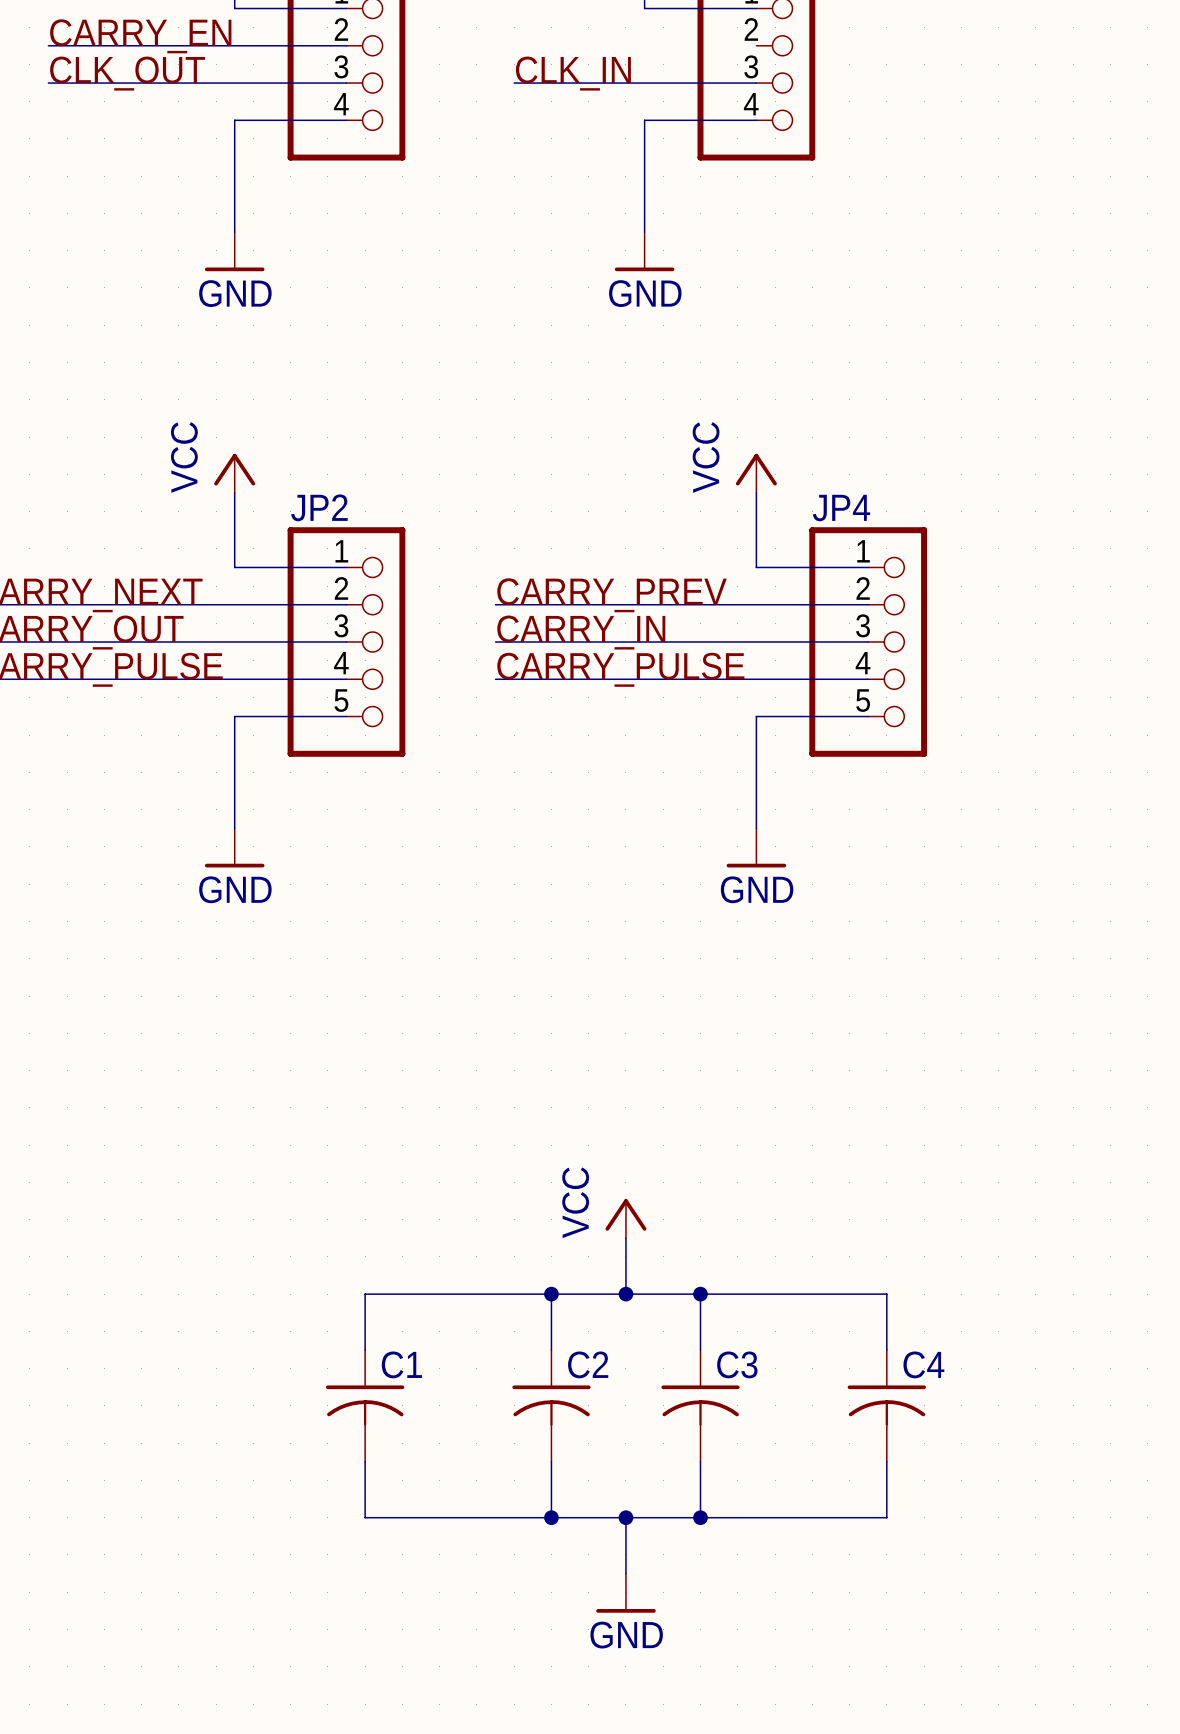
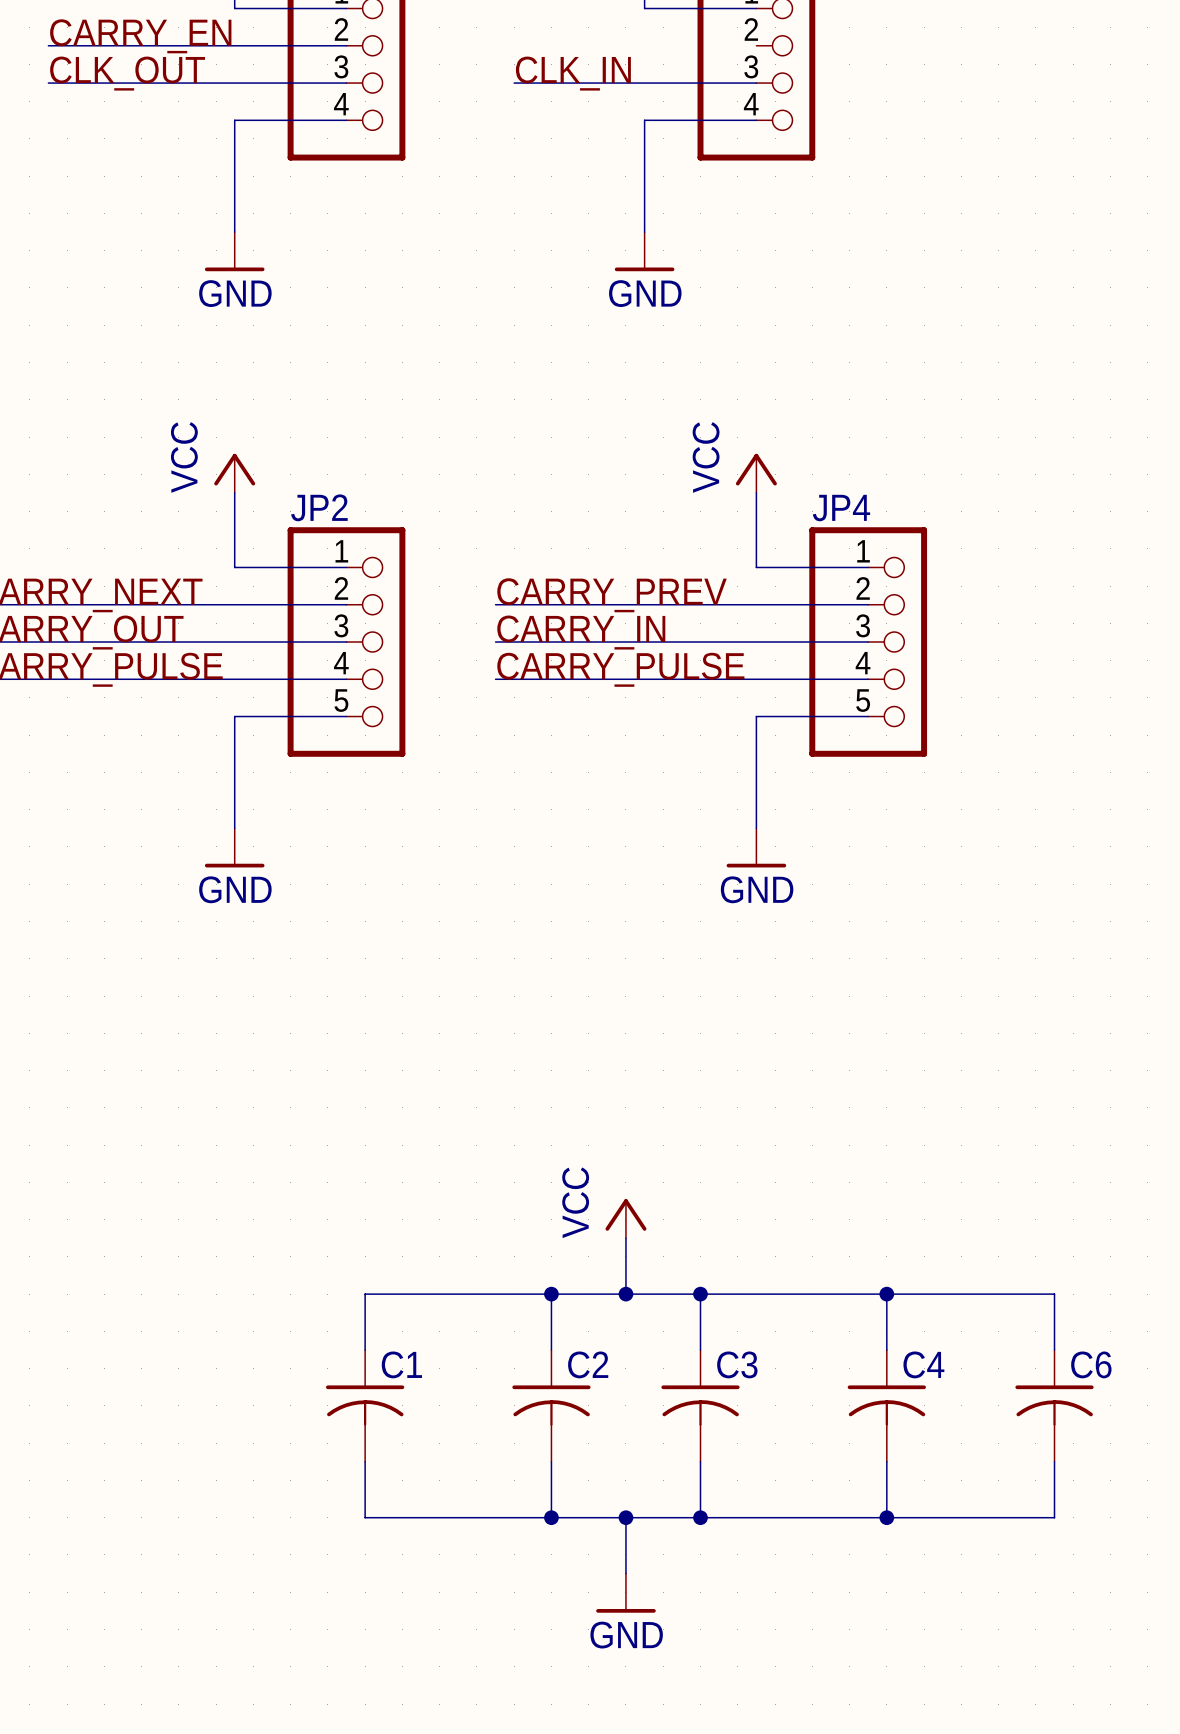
wire: none -> (886, 1294) (1054, 1294) (1054, 1350)
junction: none -> (886, 1294)
C6: none -> (1054, 1405)
wire: none -> (1054, 1461) (1054, 1517) (886, 1517)
junction: none -> (886, 1517)

